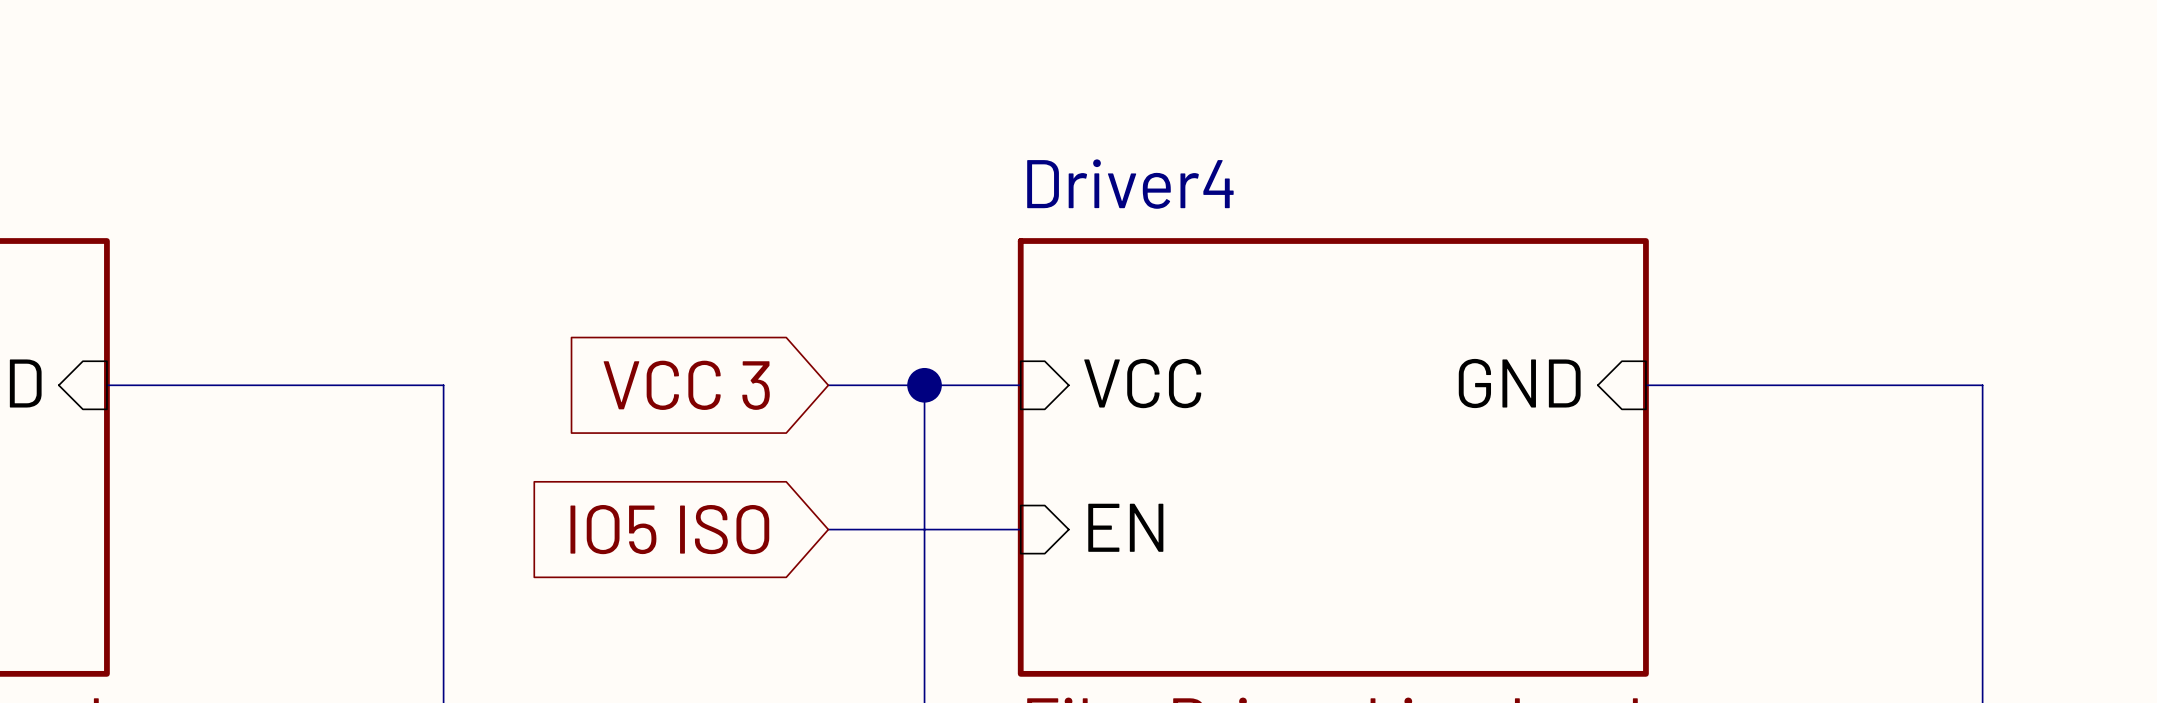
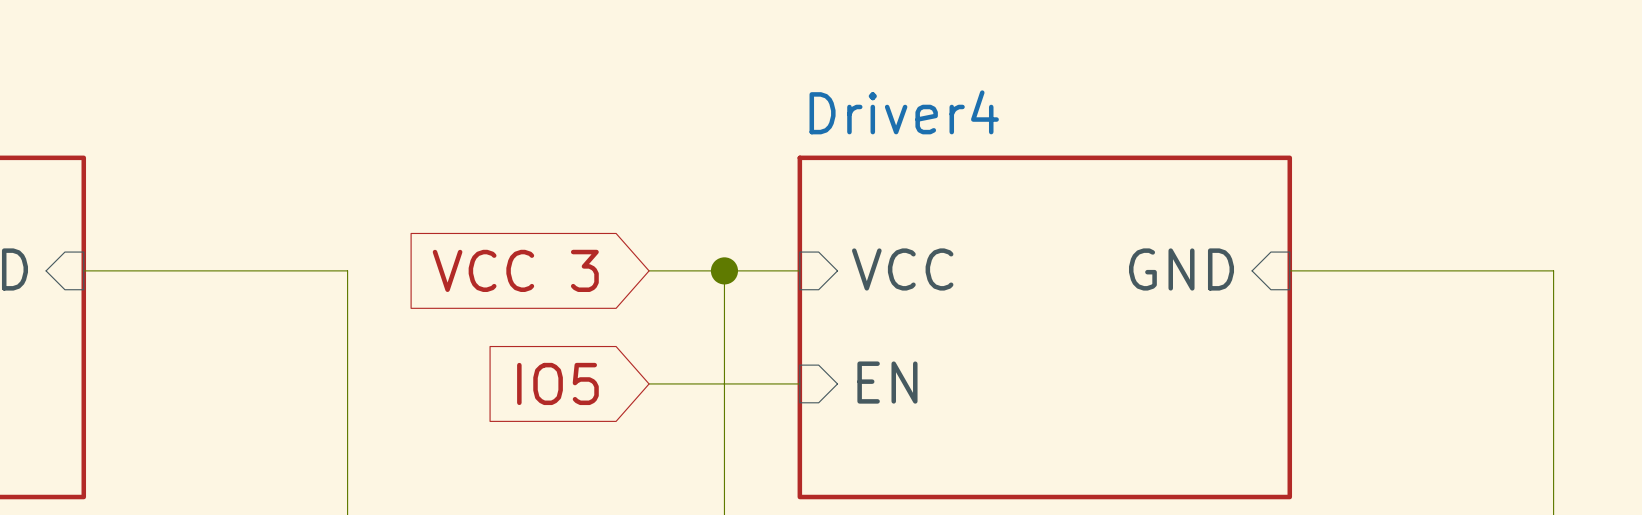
global label: IO5 ISO (669, 529) -> IO5 (557, 383)

